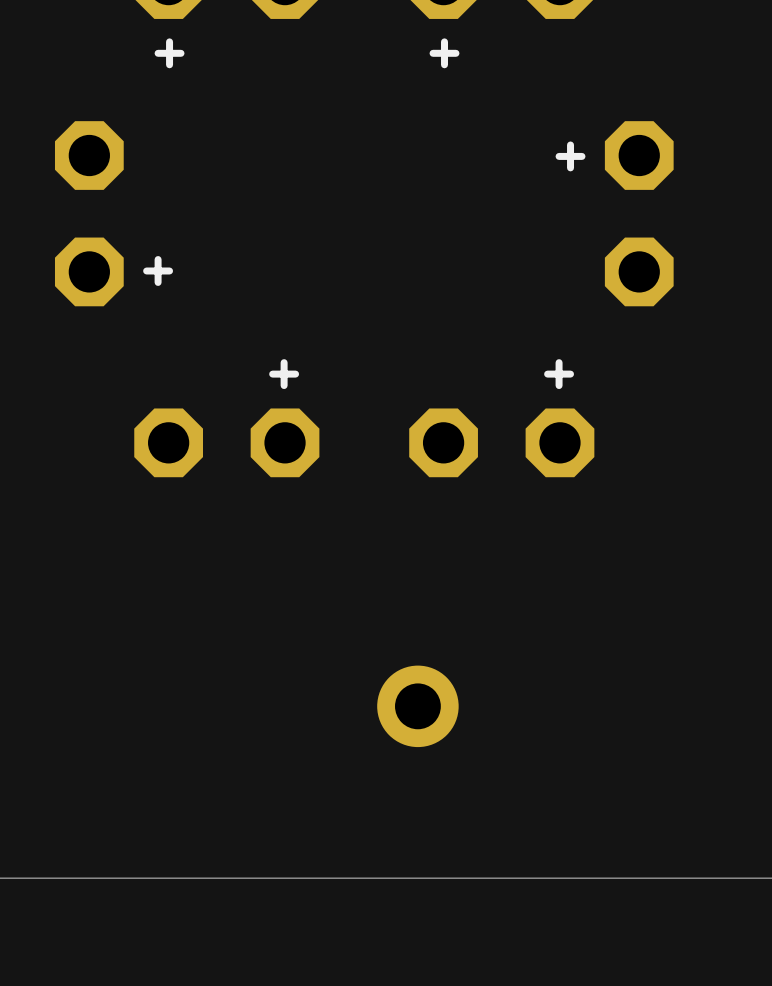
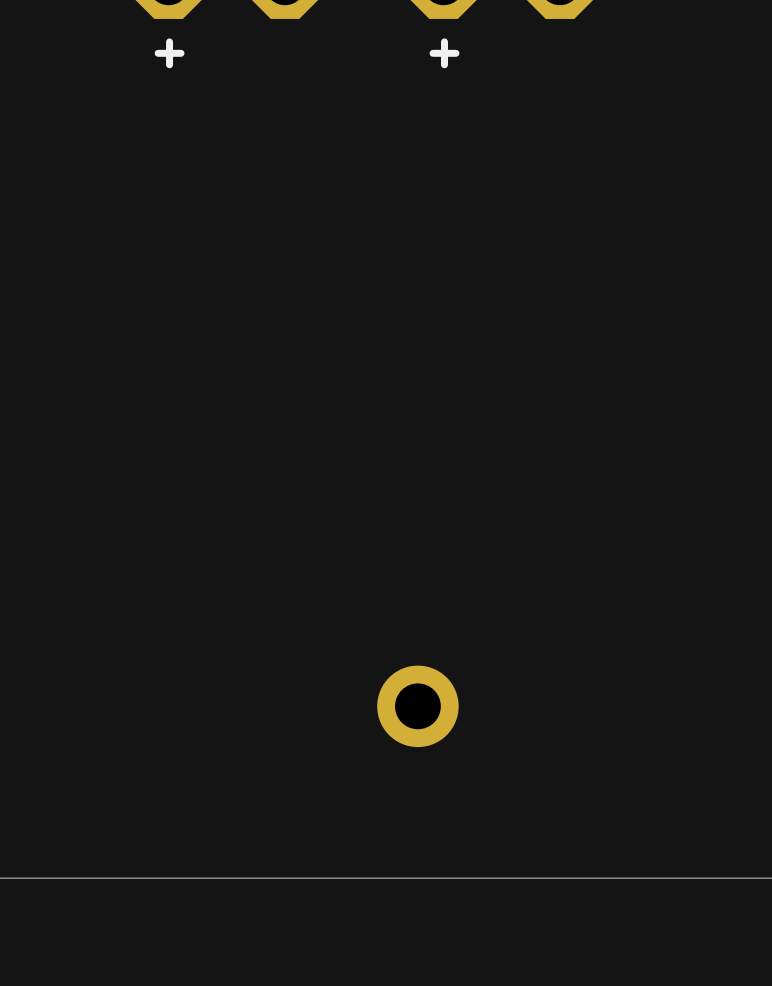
part: (114, 213) -> none
part: (614, 213) -> none
part: (226, 418) -> none
part: (501, 418) -> none

